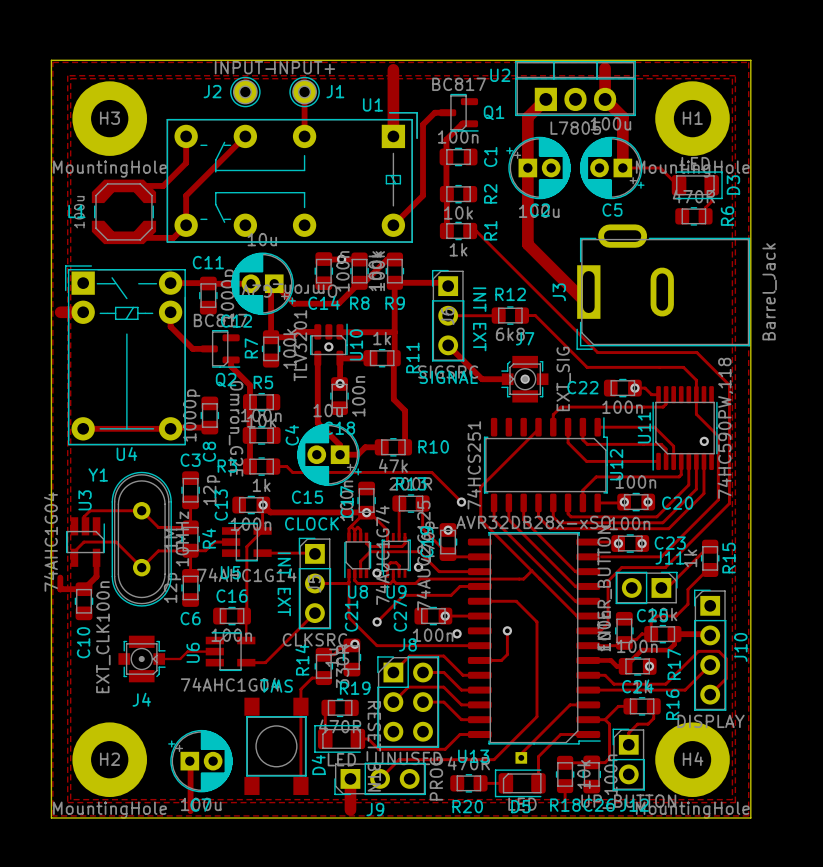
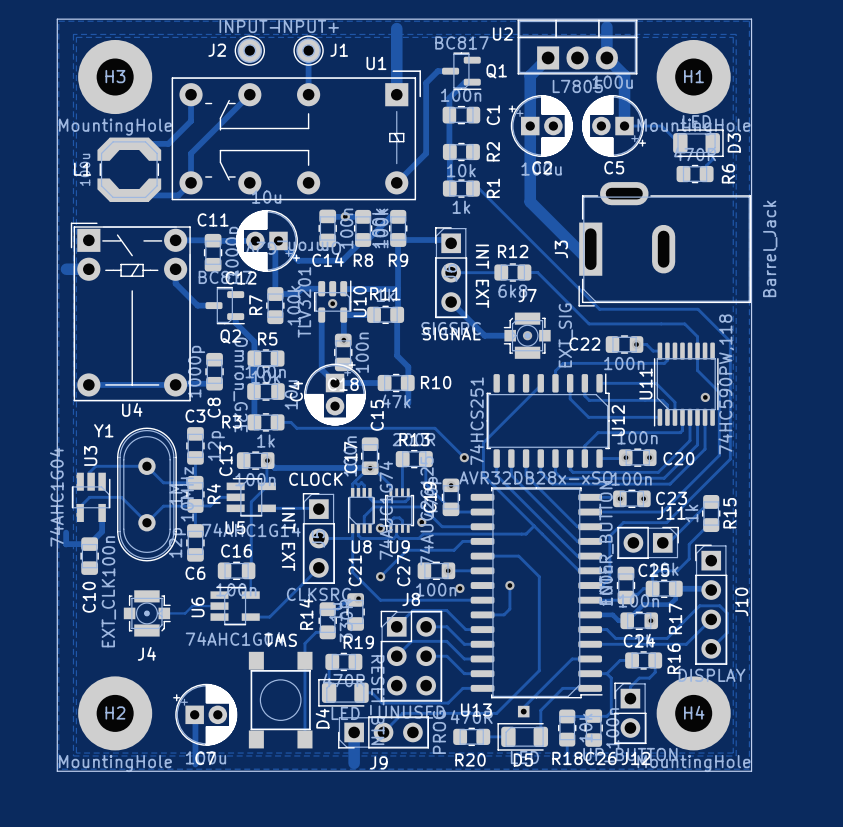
R11 name rotation: 0° (412, 357) -> 90° clockwise (385, 293)
track: (317, 413) (317, 422) (340, 445) (340, 454) (357, 454) (365, 447) (381, 447) -> (321, 369) (335, 383) (384, 383)
R10 position: (393, 447) -> (396, 383)
C15 rotation: 0° (329, 454) -> 90° counterclockwise (335, 393)

